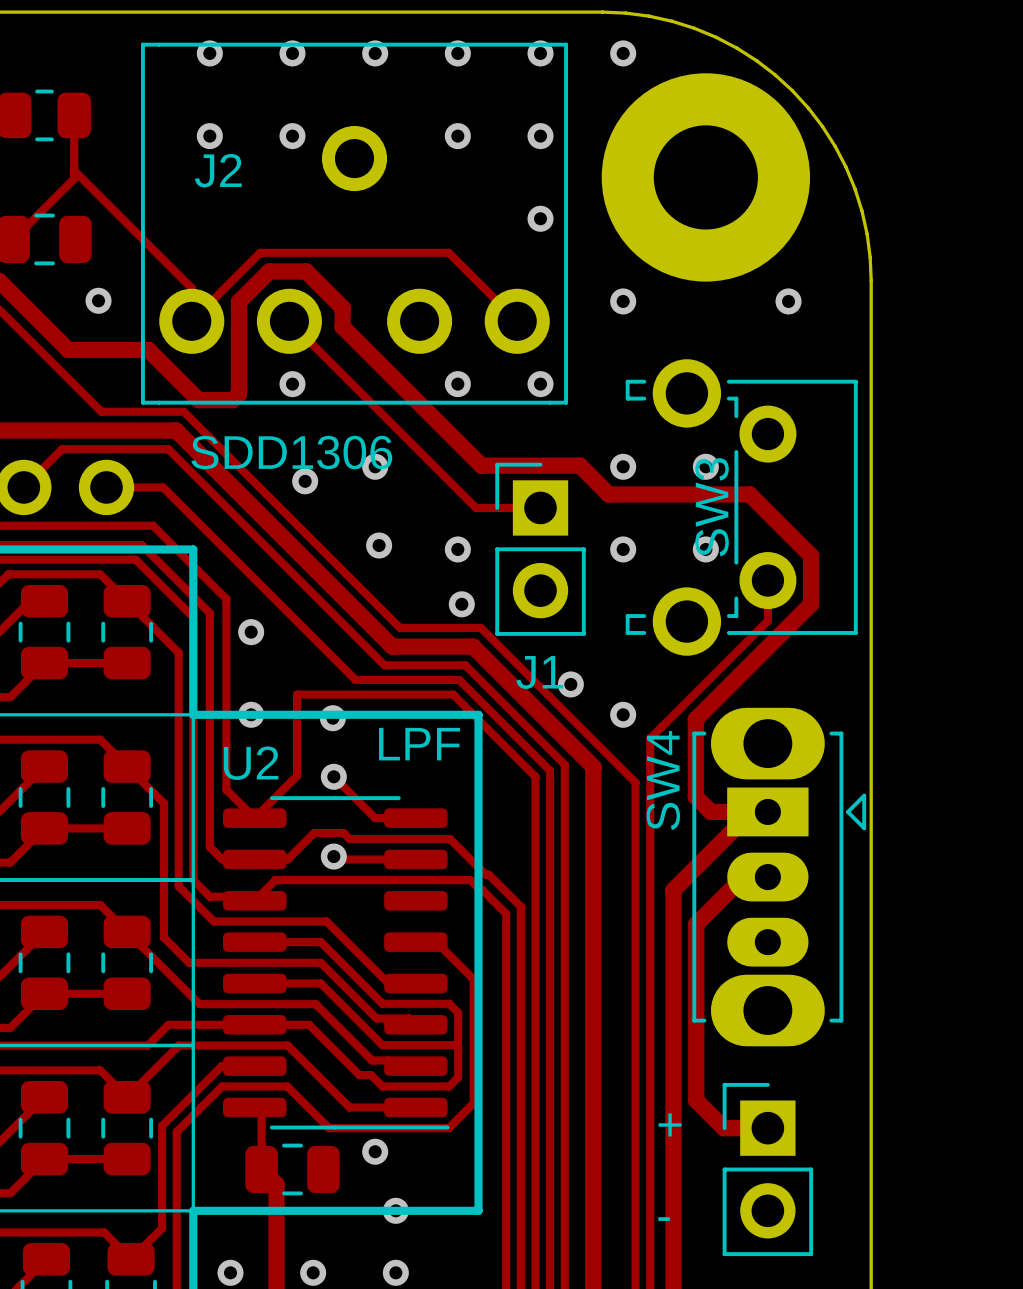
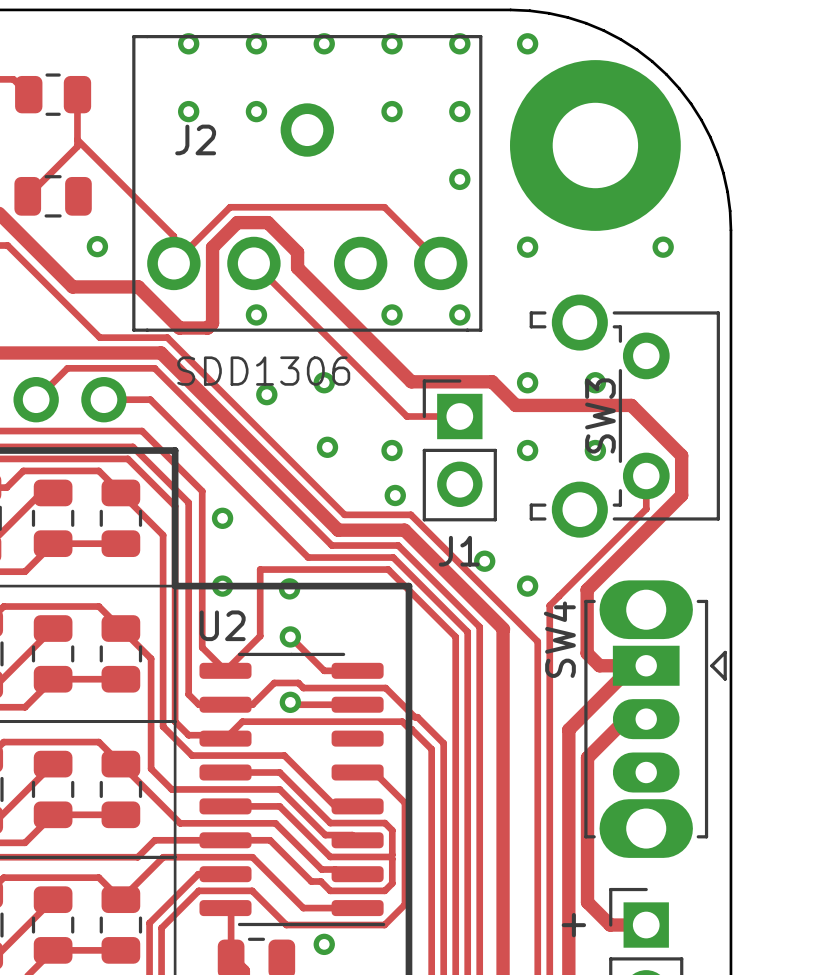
text: LPF (419, 744) -> none

